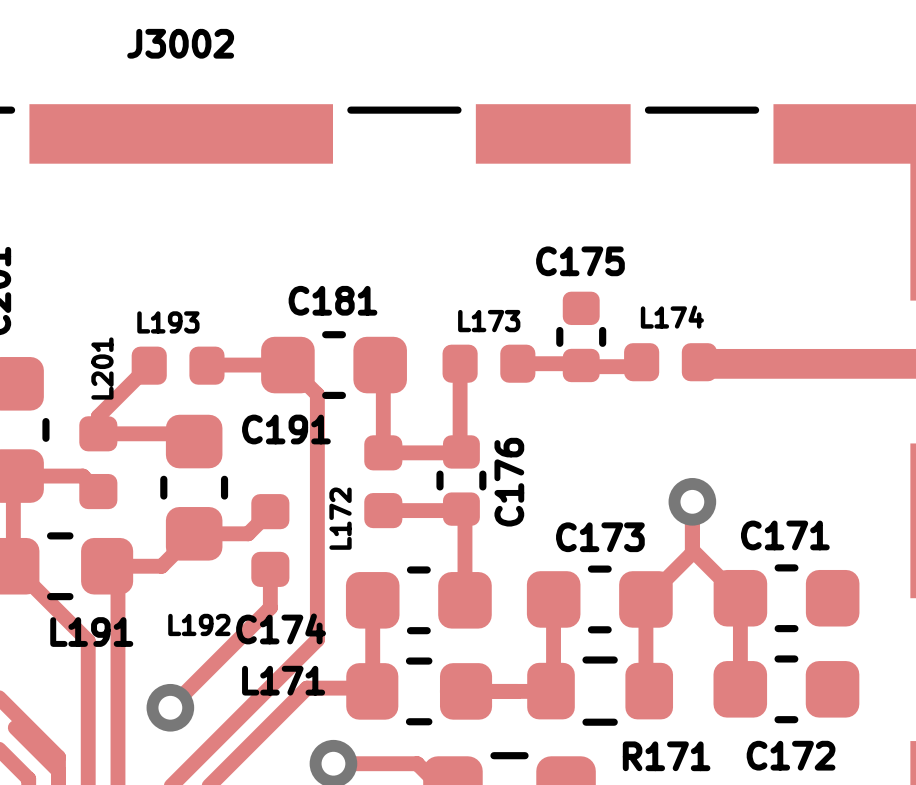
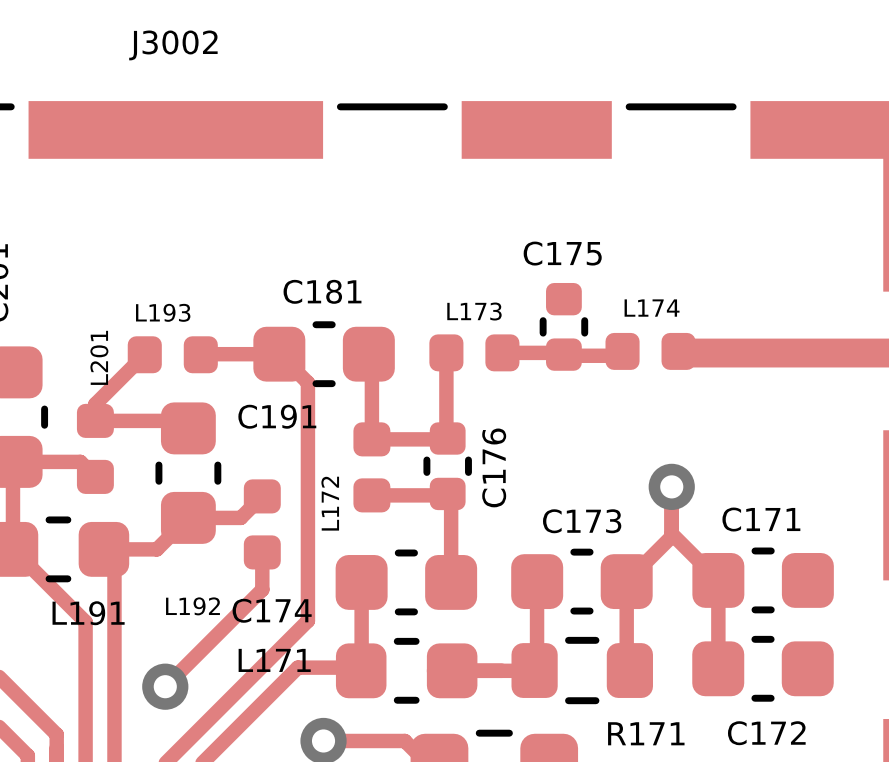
track: (15, 727) (58, 770) -> none

